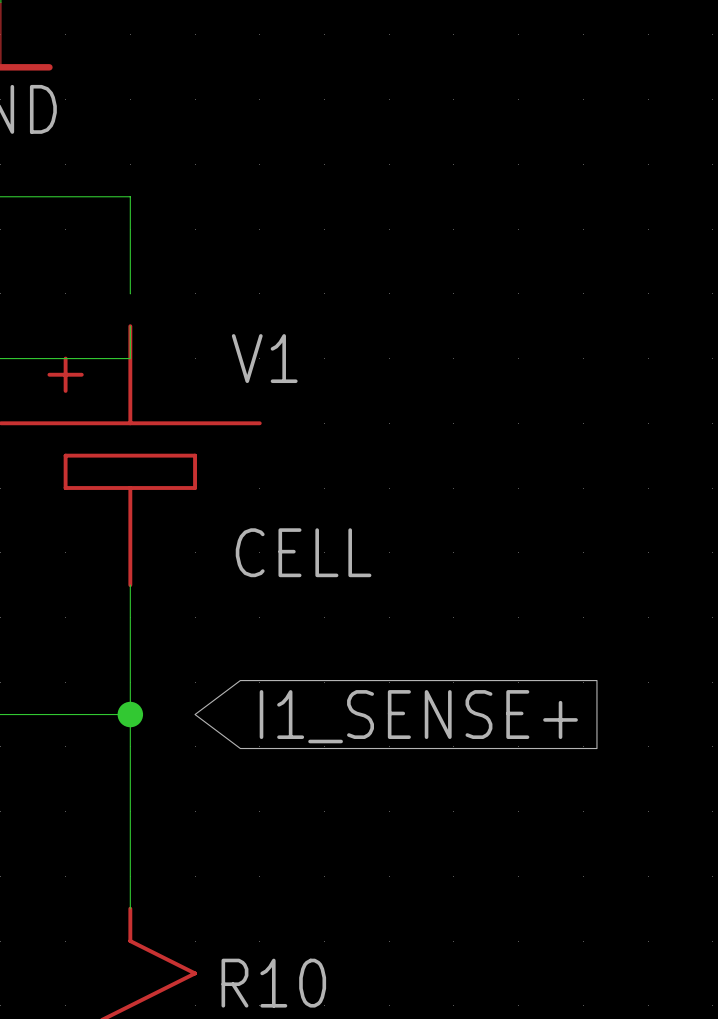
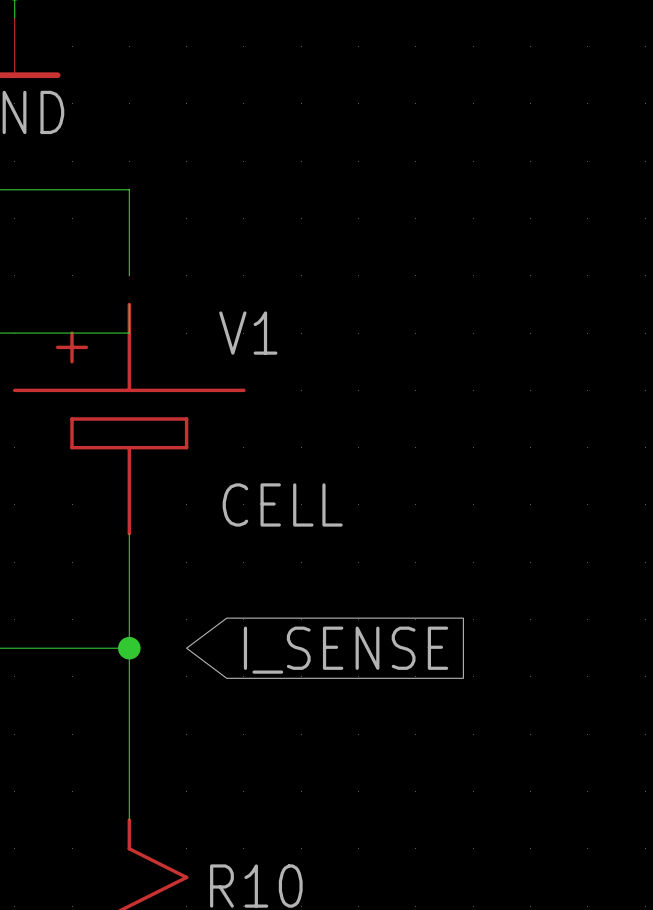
global label: I1_SENSE+ (418, 716) -> I_SENSE (346, 650)

